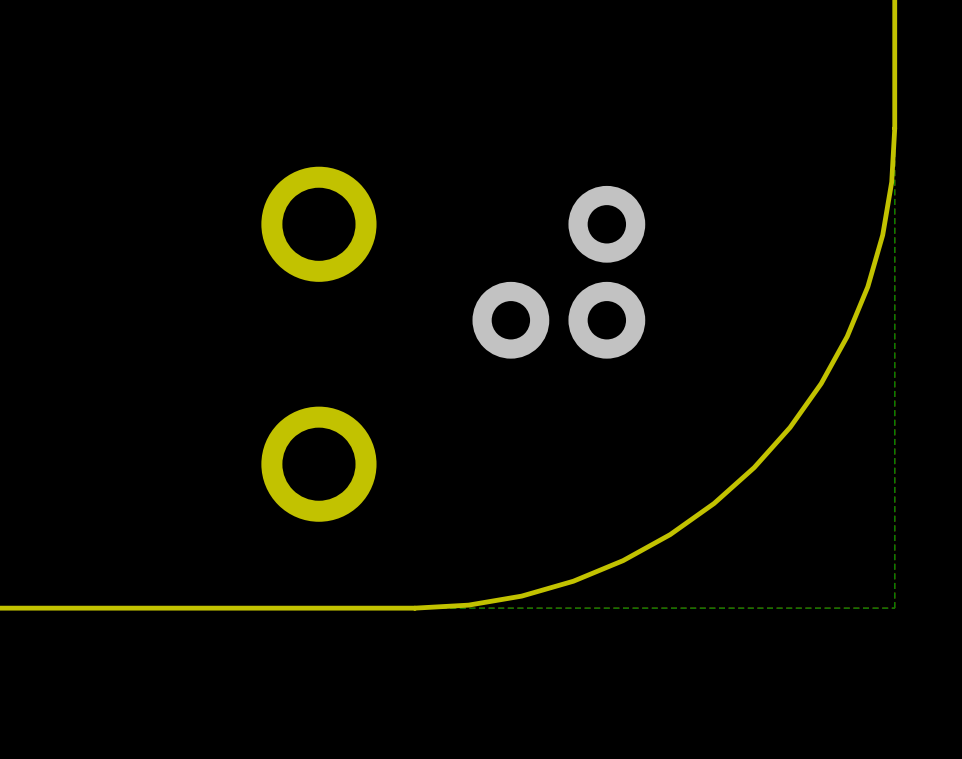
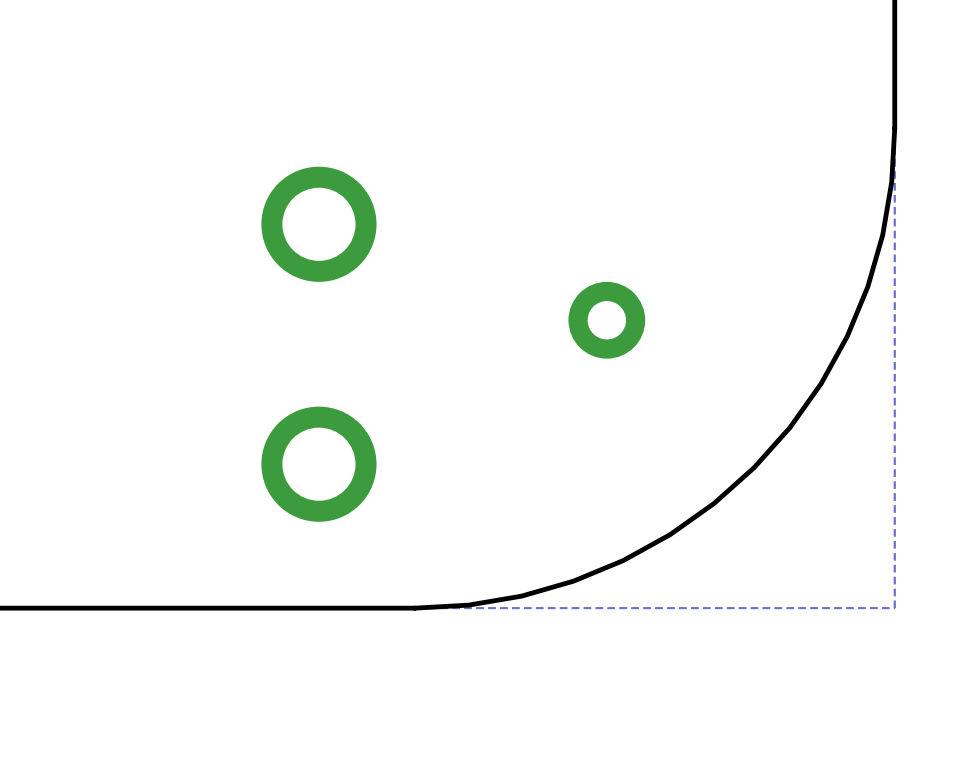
via: (606, 224) -> none
via: (510, 320) -> none

